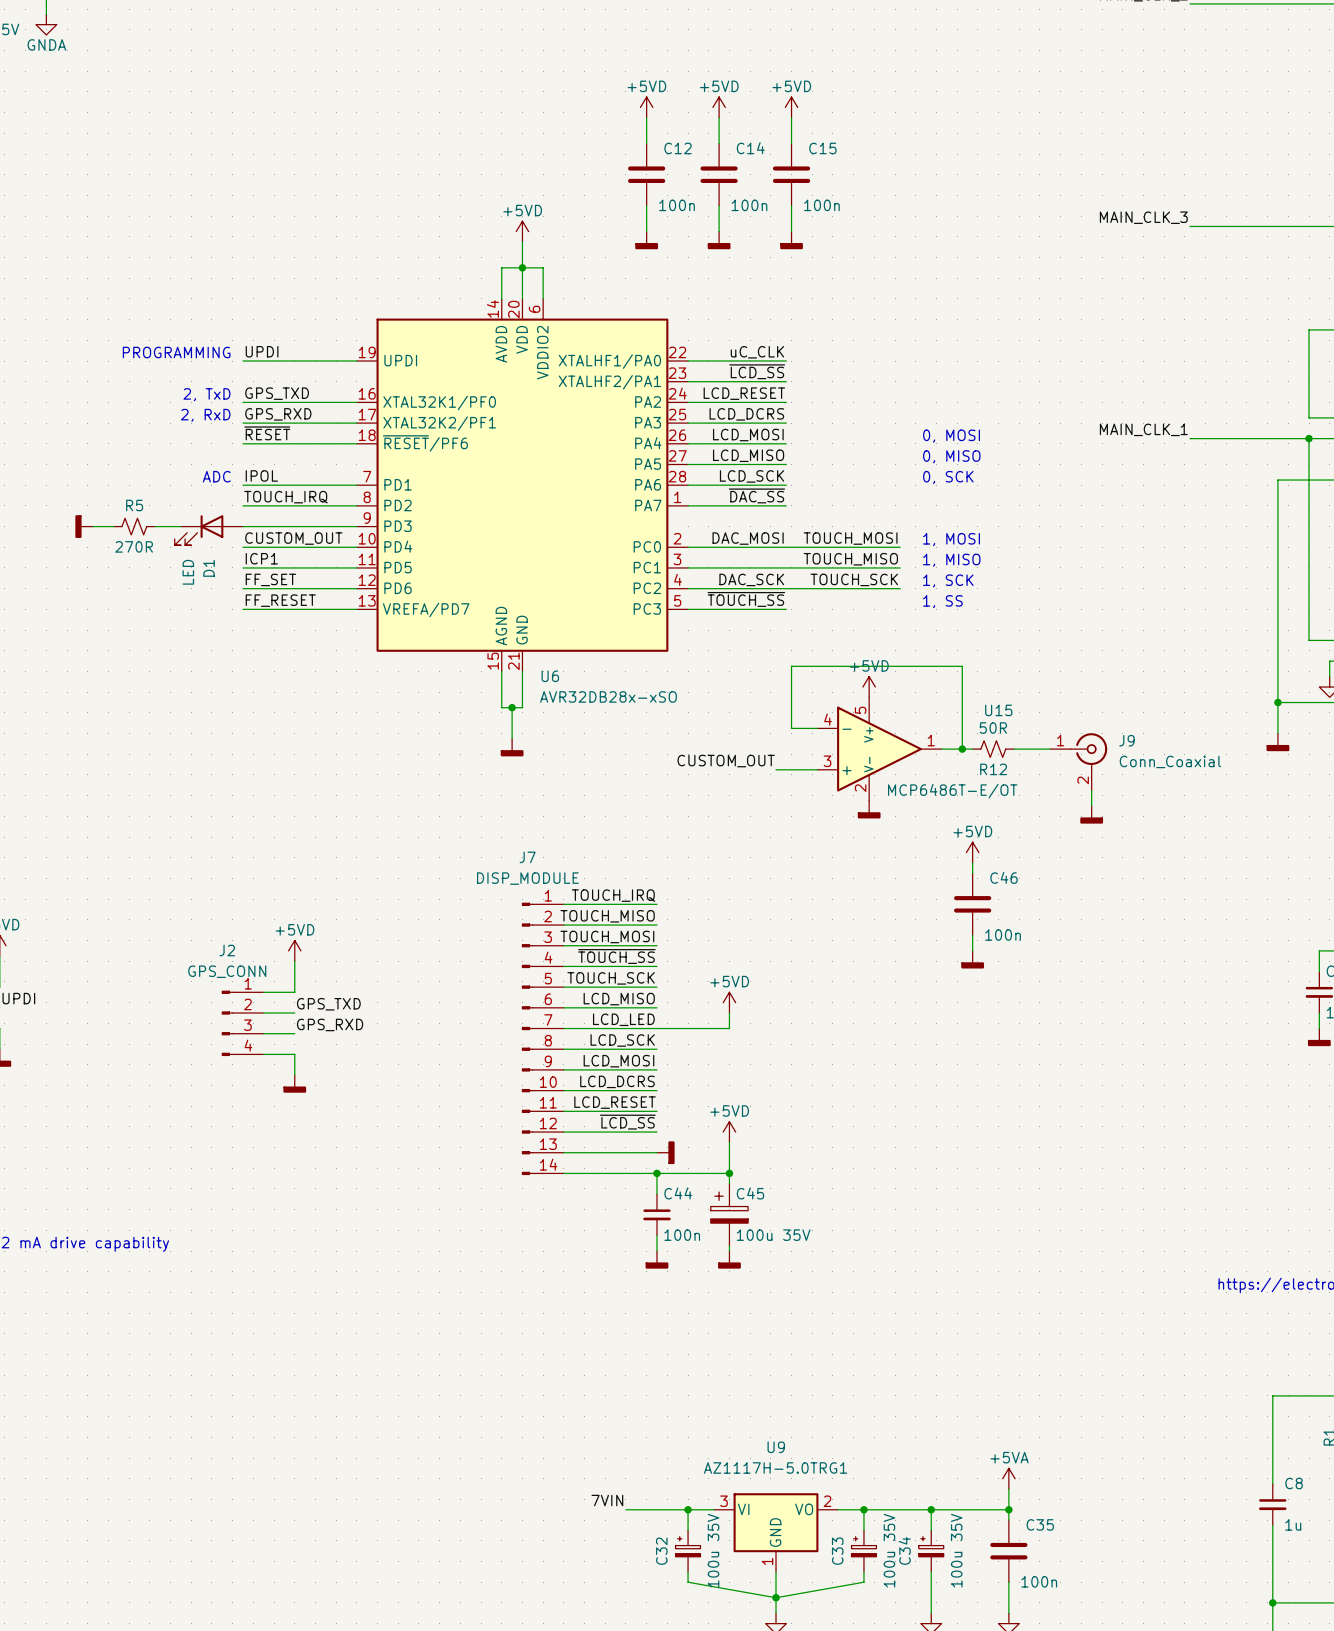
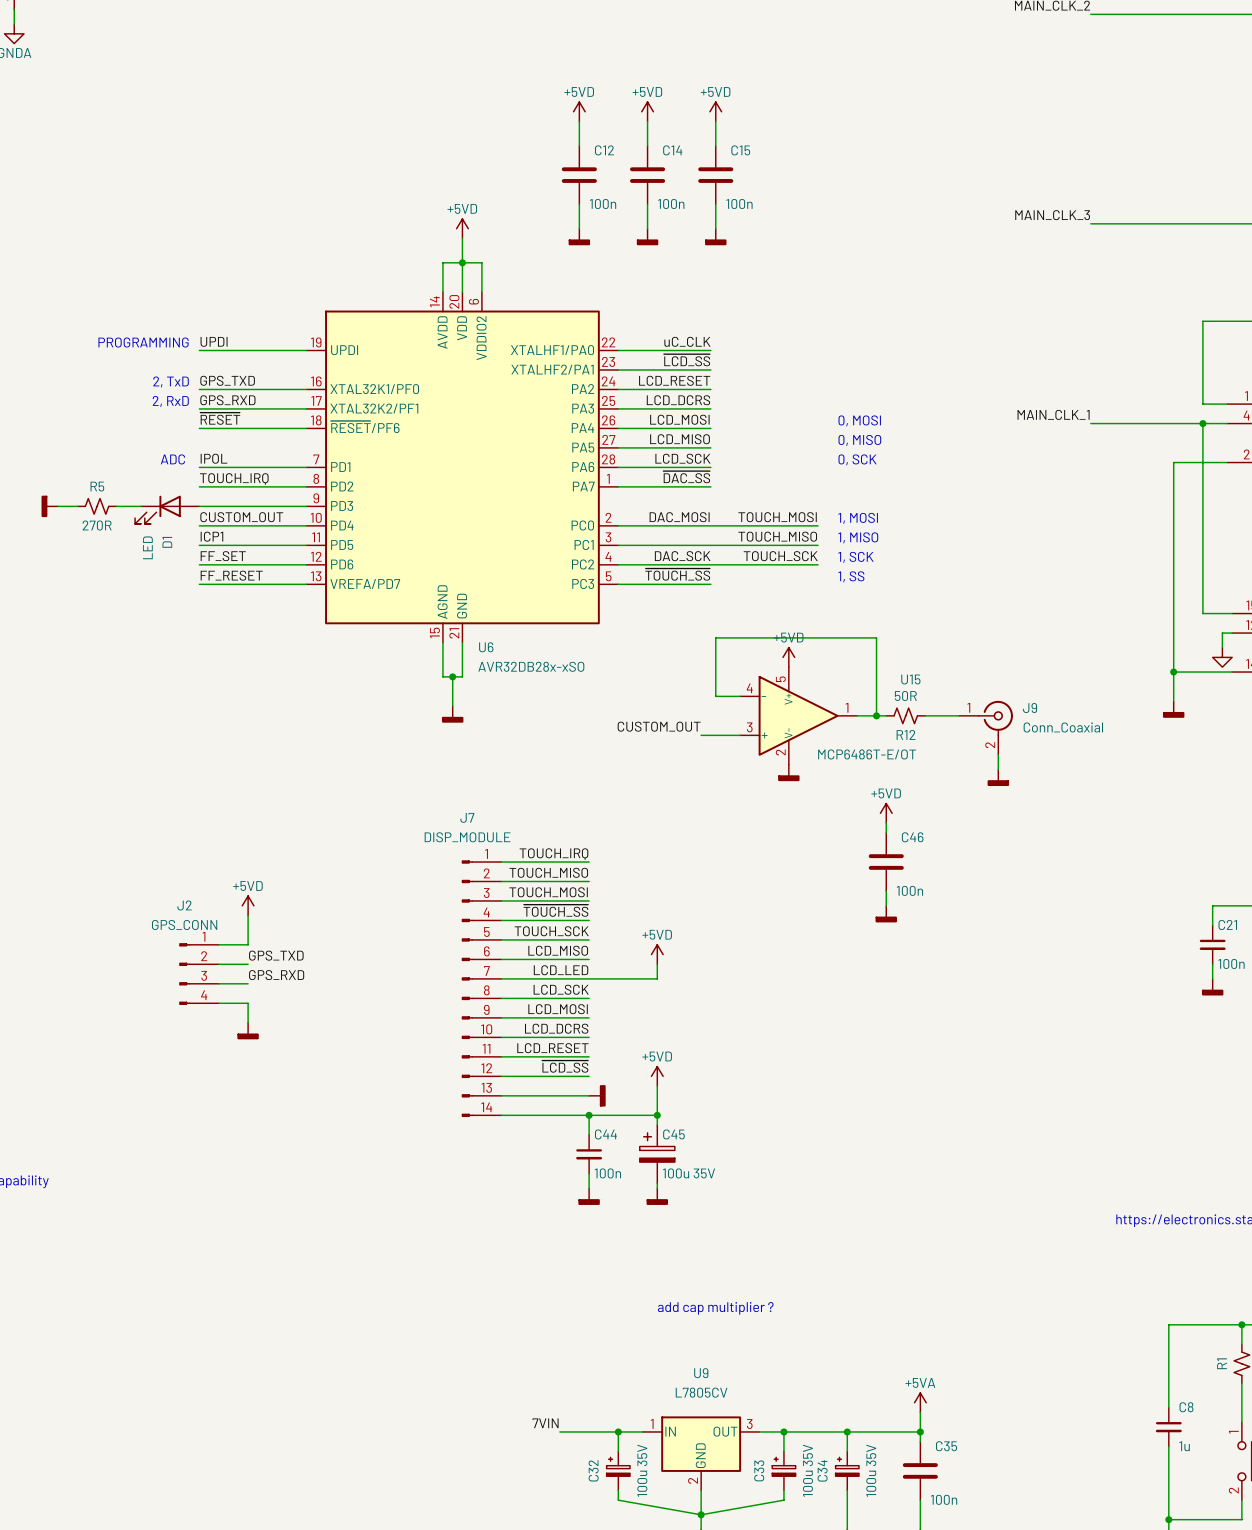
text: none -> add cap multiplier ? (715, 1308)
U9 value: AZ1117H-5.0TRG1 (775, 1467) -> L7805CV (701, 1392)
U9 pin number: 3 (724, 1501) -> 1 (652, 1423)
U9 pin number: 2 (827, 1501) -> 3 (749, 1424)
U9 pin name: VI (743, 1509) -> IN (670, 1431)
U9 pin name: VO (804, 1509) -> OUT (725, 1431)
U9 pin number: 1 (767, 1561) -> 2 (693, 1480)

